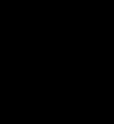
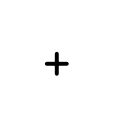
text: none -> + (56, 63)

